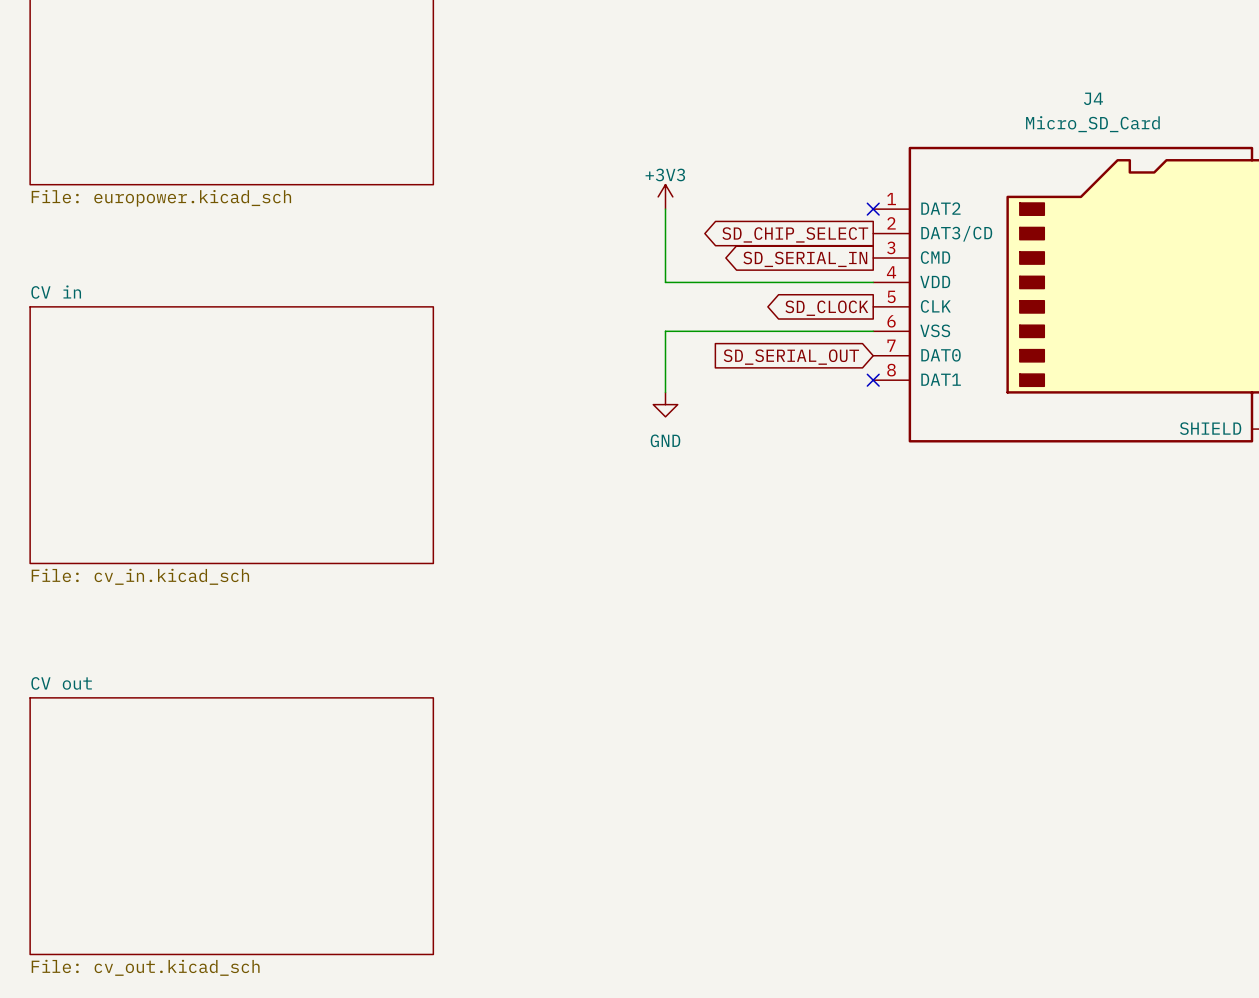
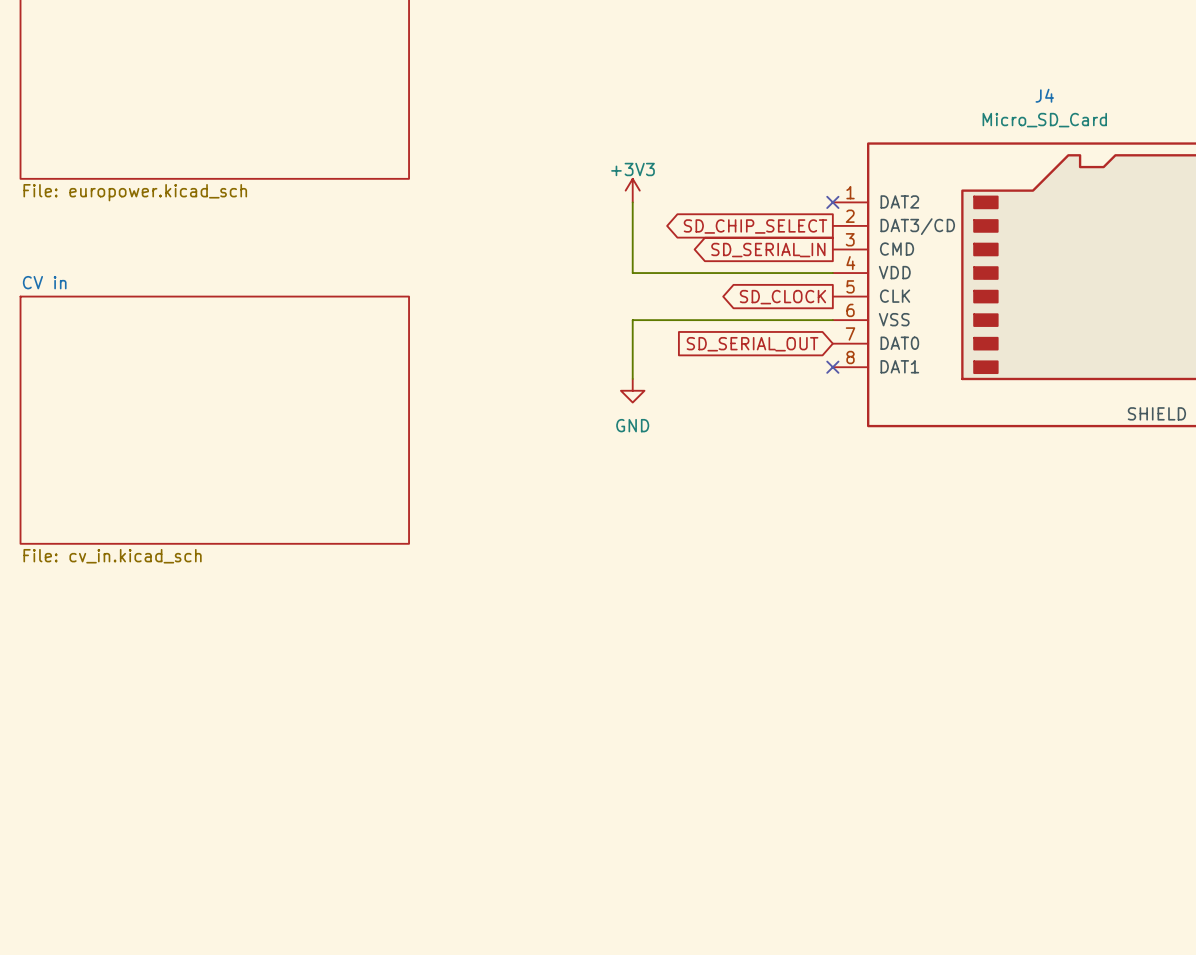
sheet CV out: File: cv_out.kicad_sch (231, 826) -> none

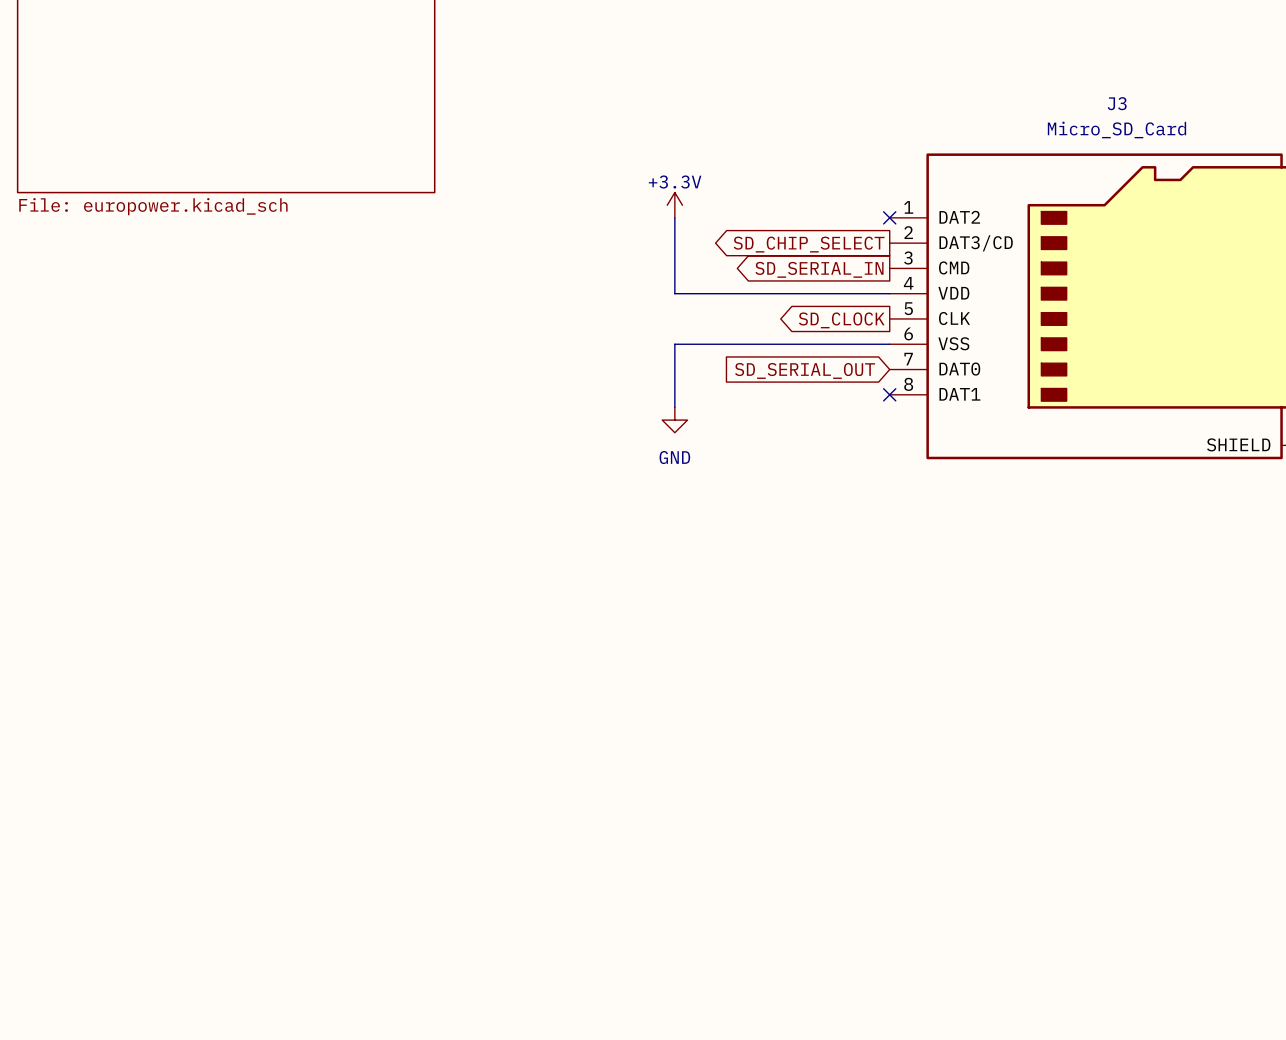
J4 name: J4 (1044, 95) -> J3 (1117, 103)
power symbol: +3V3 (632, 190) -> +3.3V (674, 205)
sheet CV in: File: cv_in.kicad_sch (214, 420) -> none

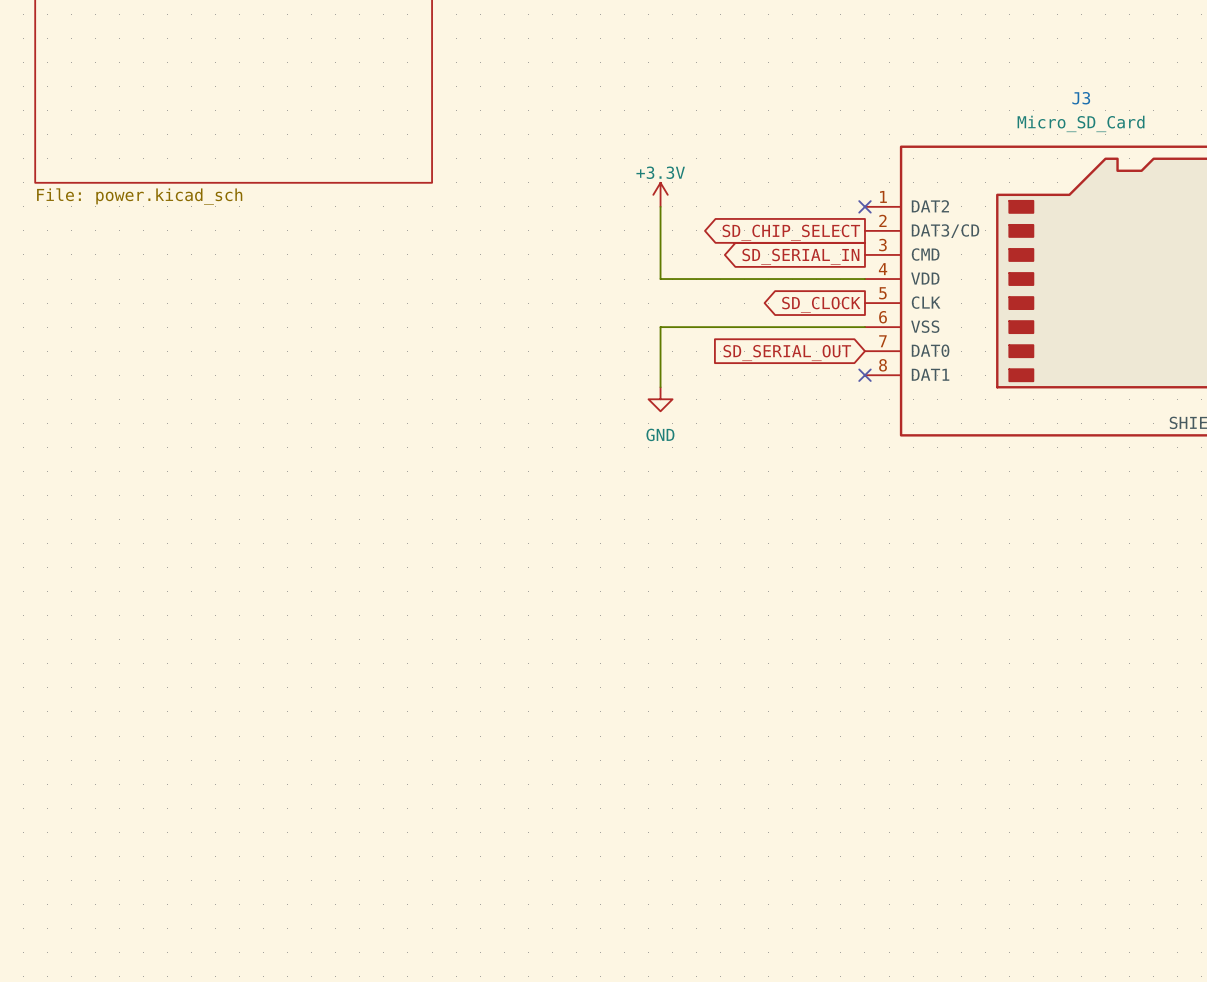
sheet value: File: europower.kicad_sch (153, 206) -> File: power.kicad_sch (139, 196)

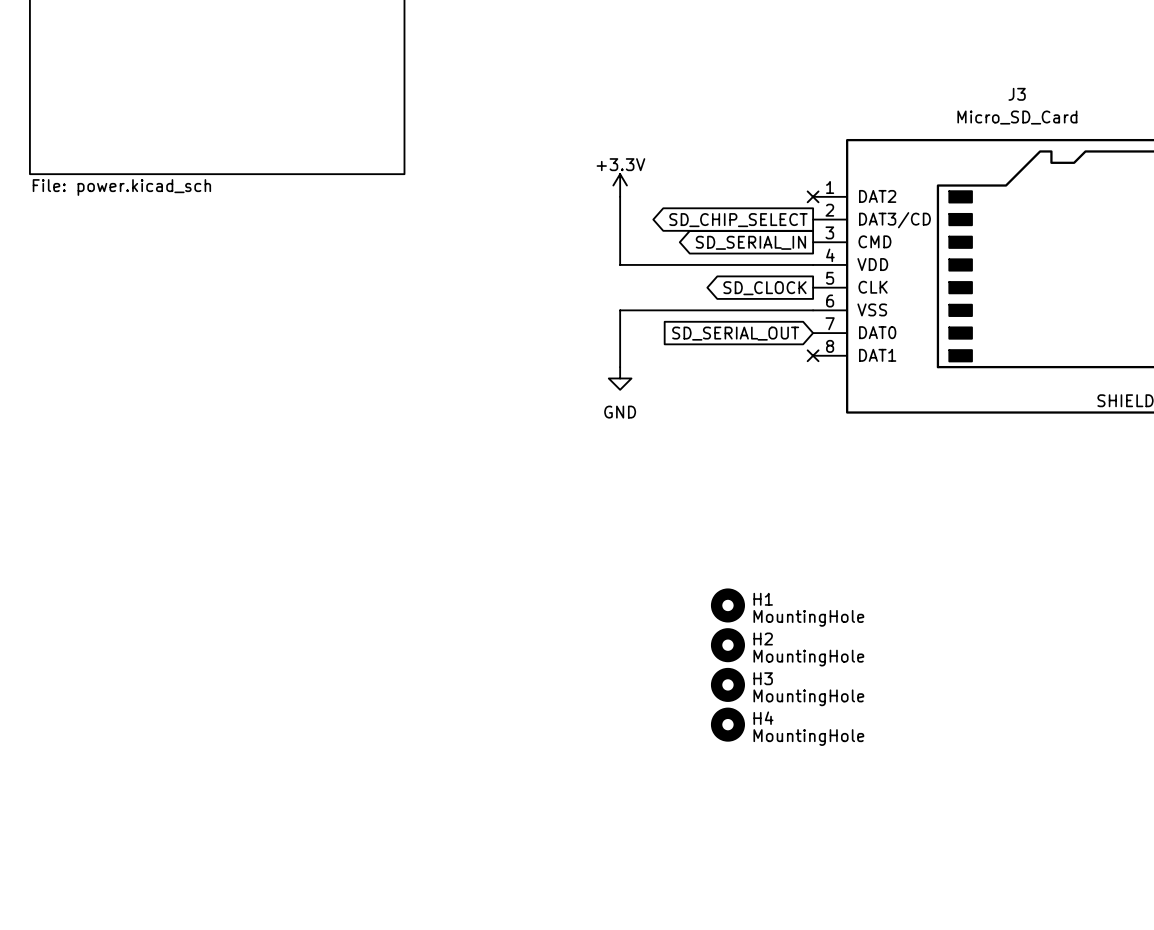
H1: none -> MountingHole (727, 605)
H2: none -> MountingHole (727, 645)
H3: none -> MountingHole (727, 684)
H4: none -> MountingHole (727, 724)

